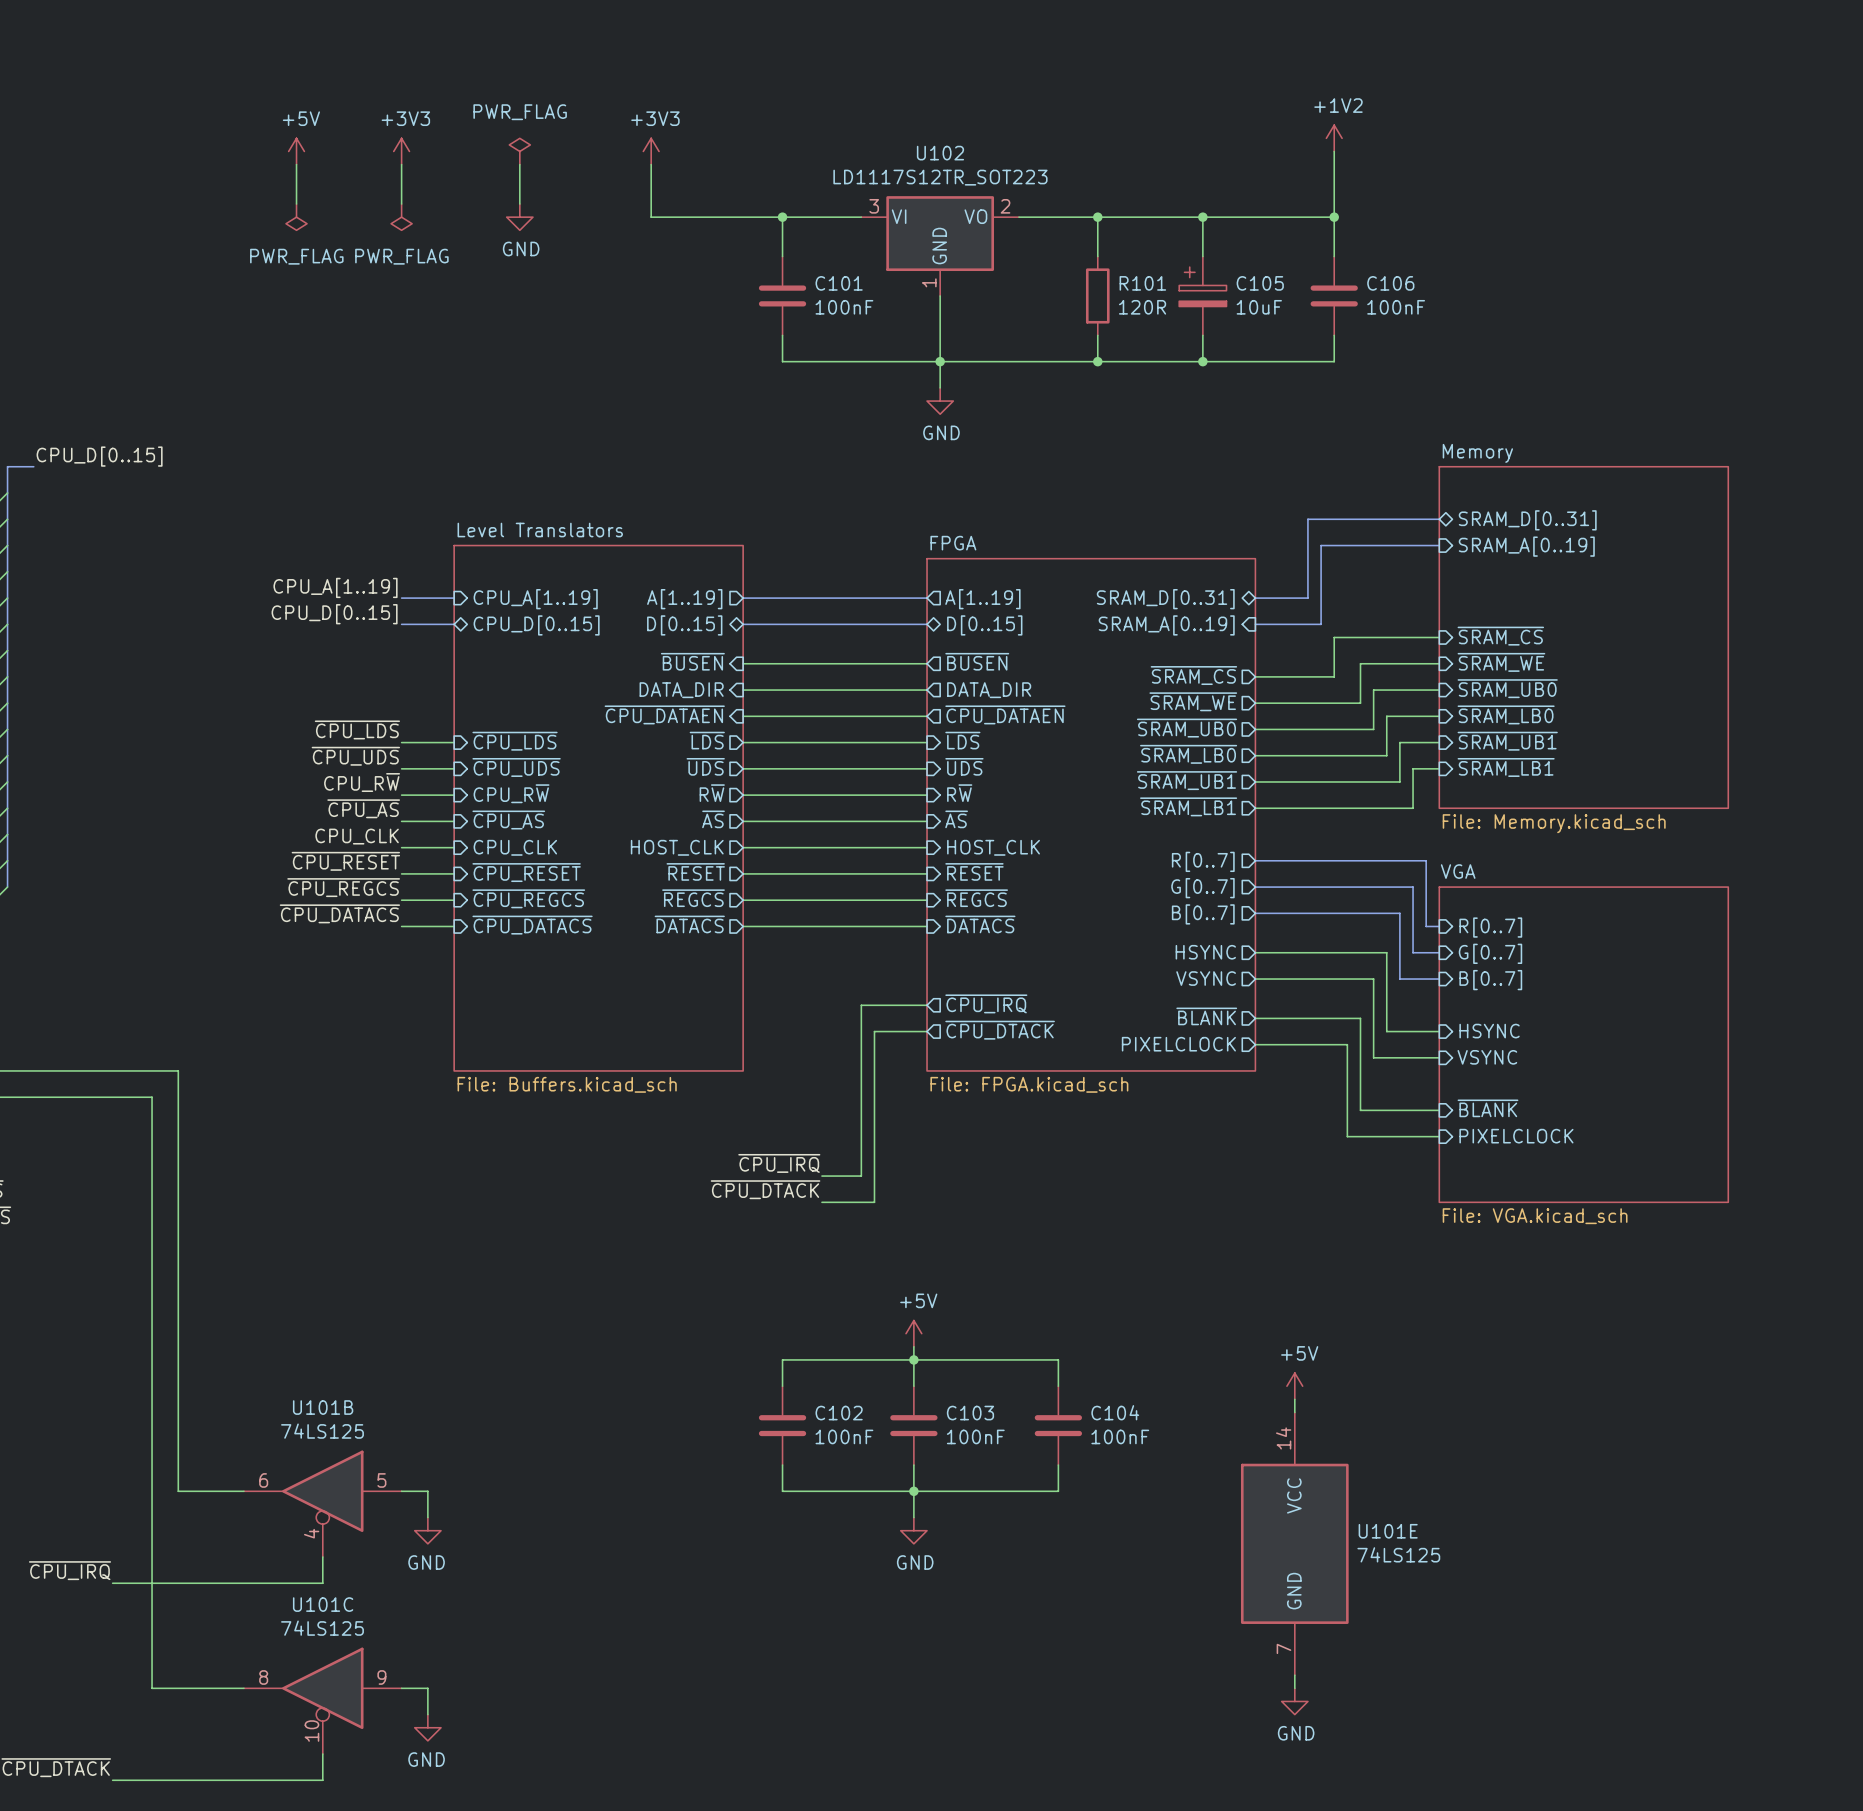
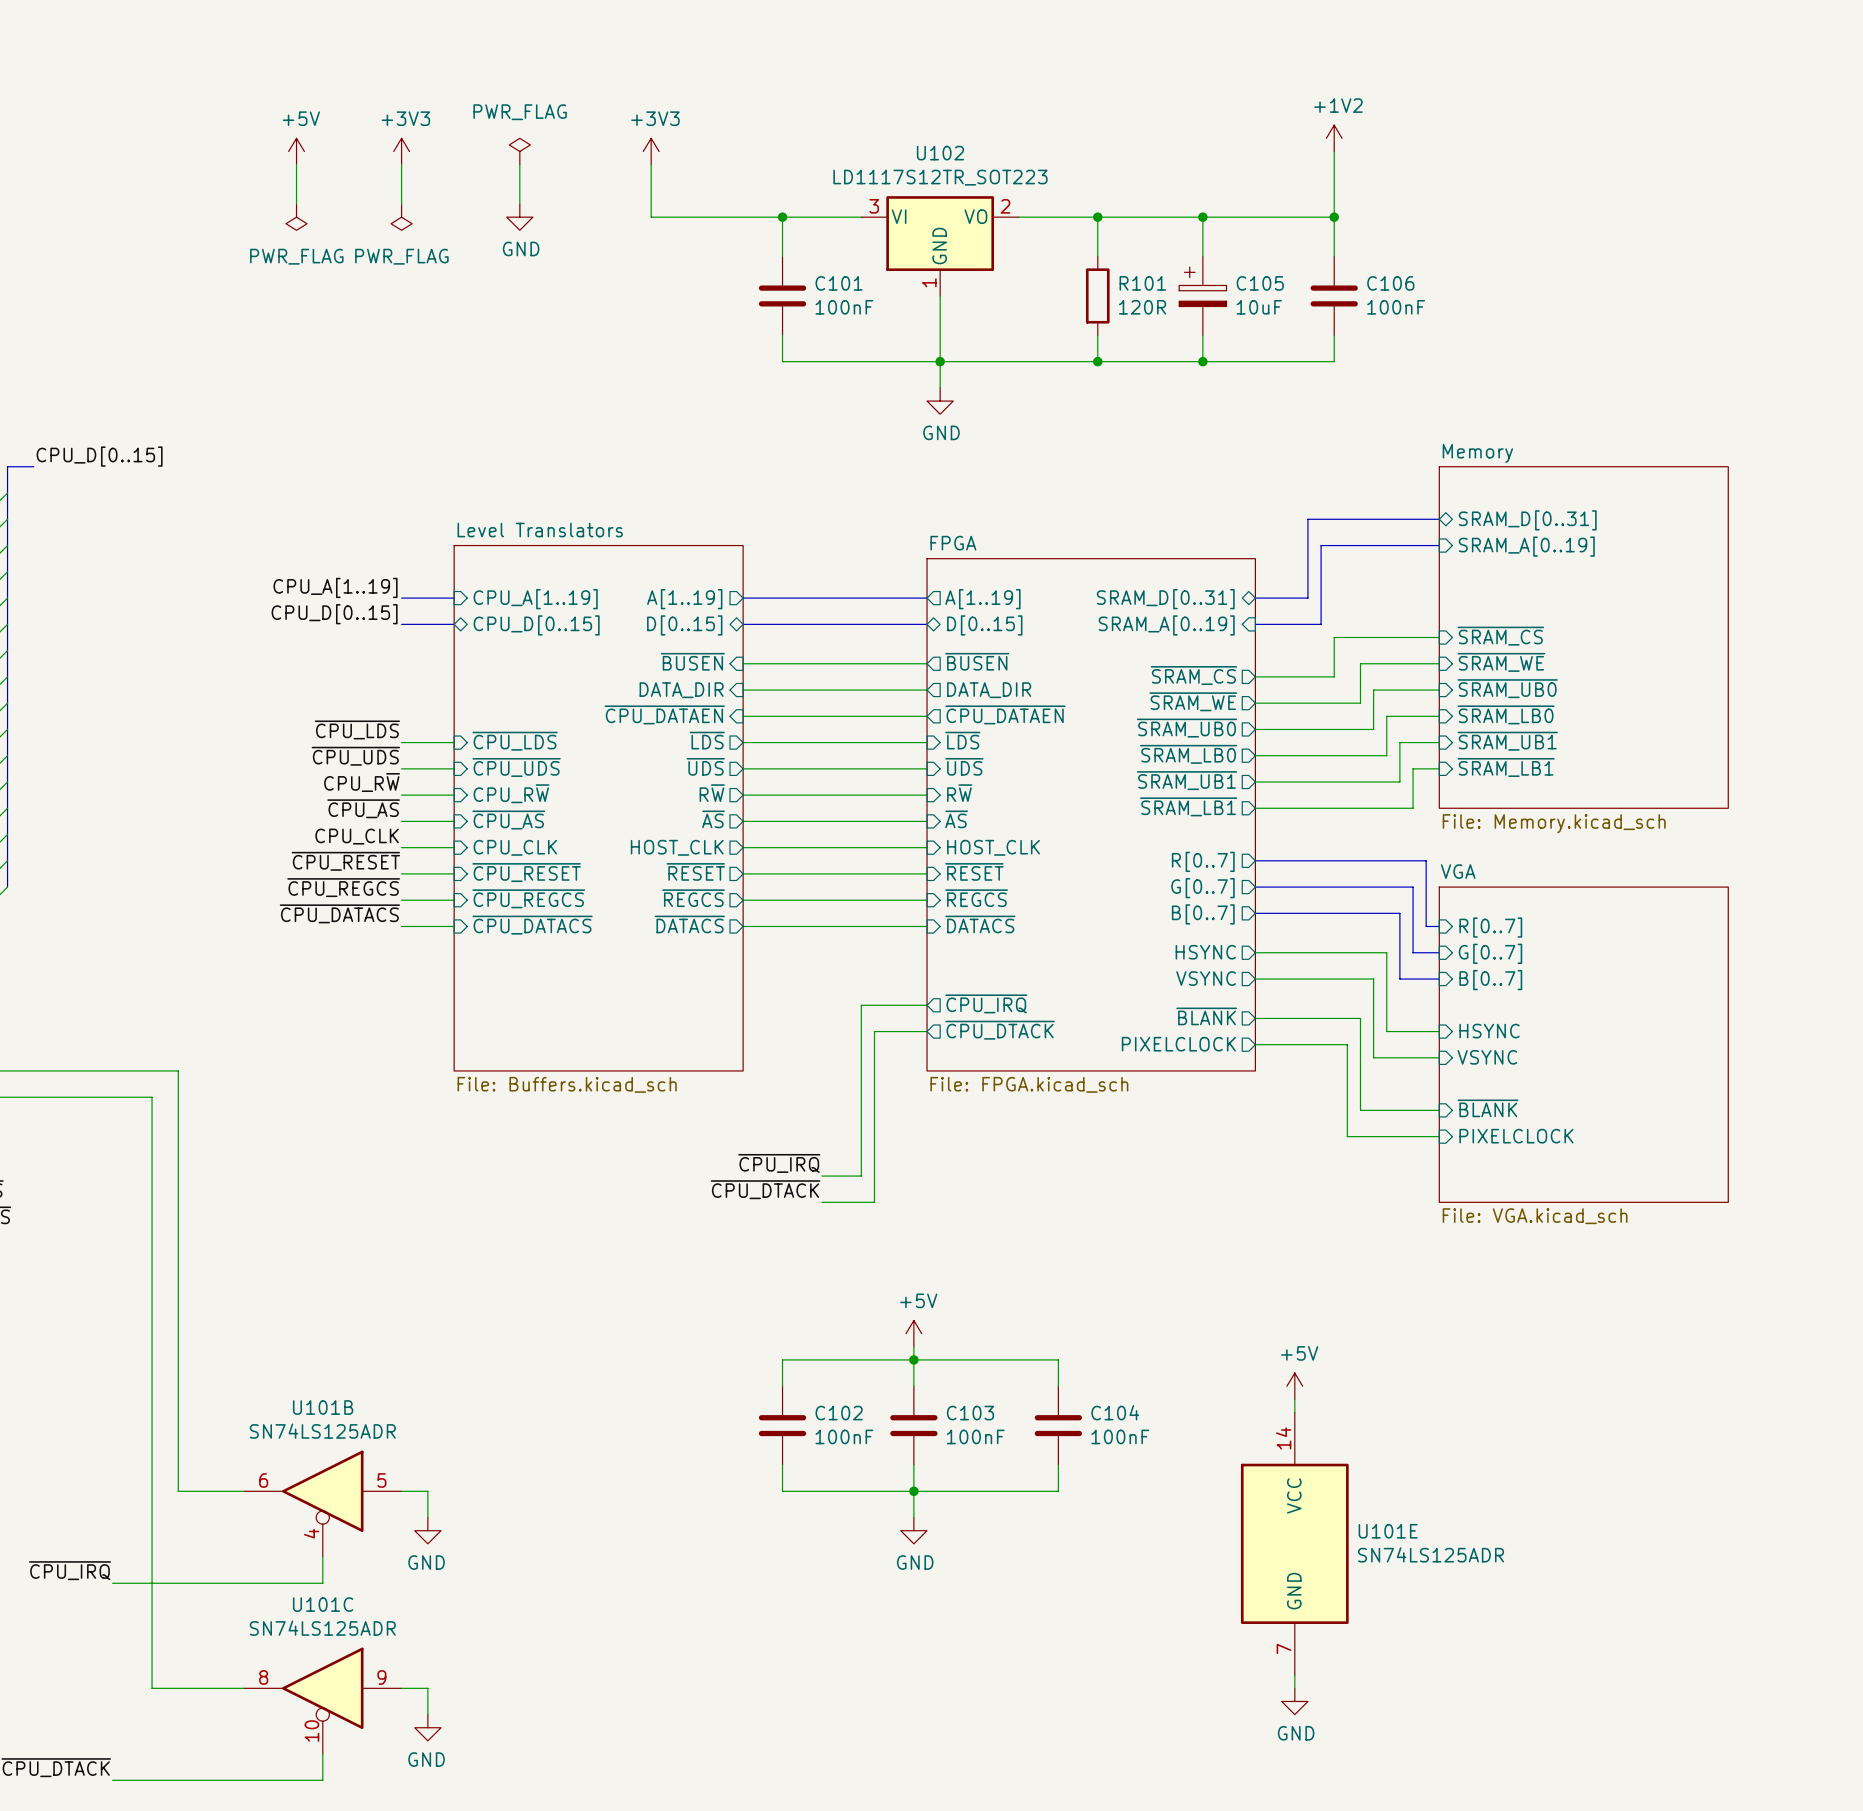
U101B value: 74LS125 (322, 1431) -> SN74LS125ADR (322, 1431)
U101E value: 74LS125 (1398, 1554) -> SN74LS125ADR (1431, 1554)
U101C value: 74LS125 (322, 1628) -> SN74LS125ADR (322, 1628)

